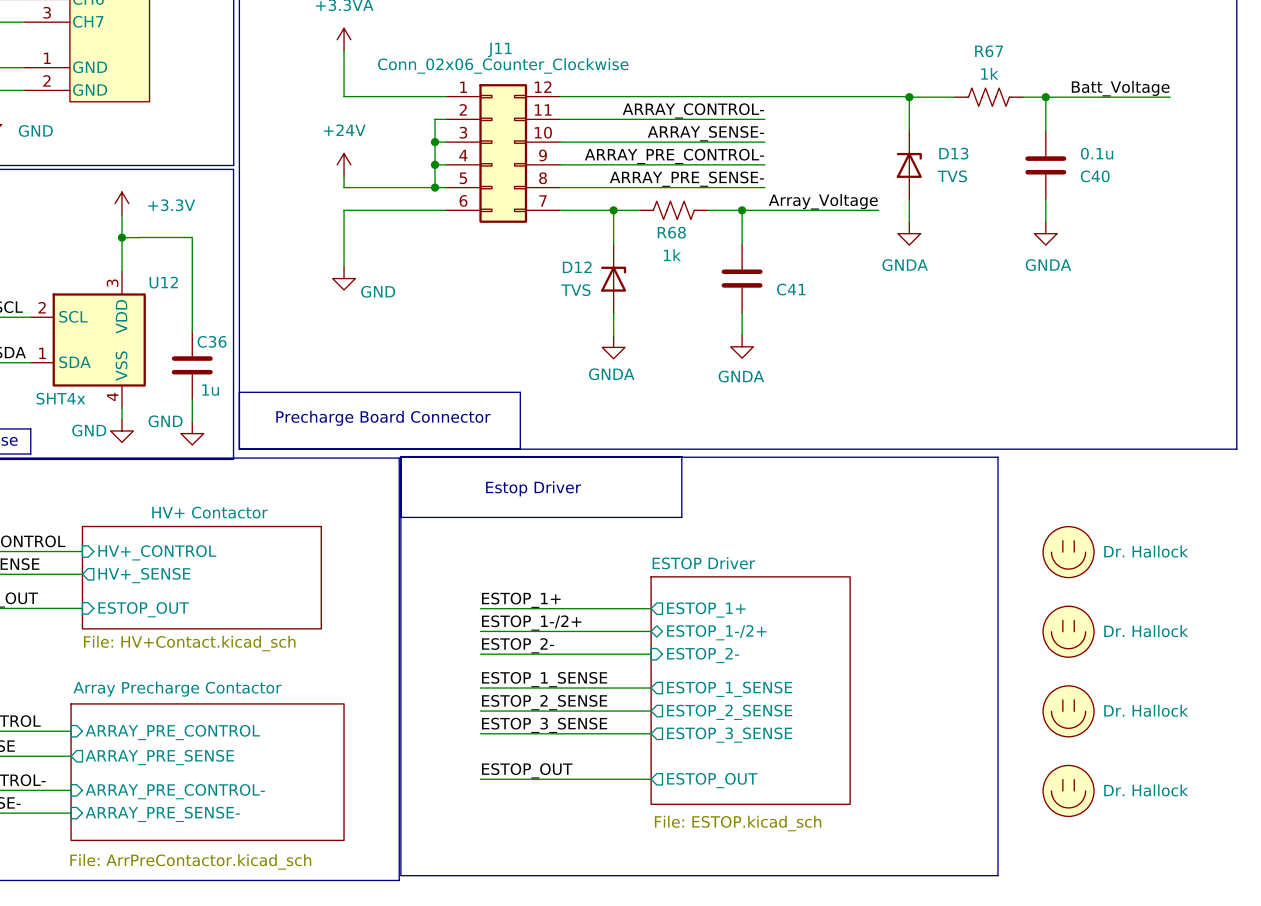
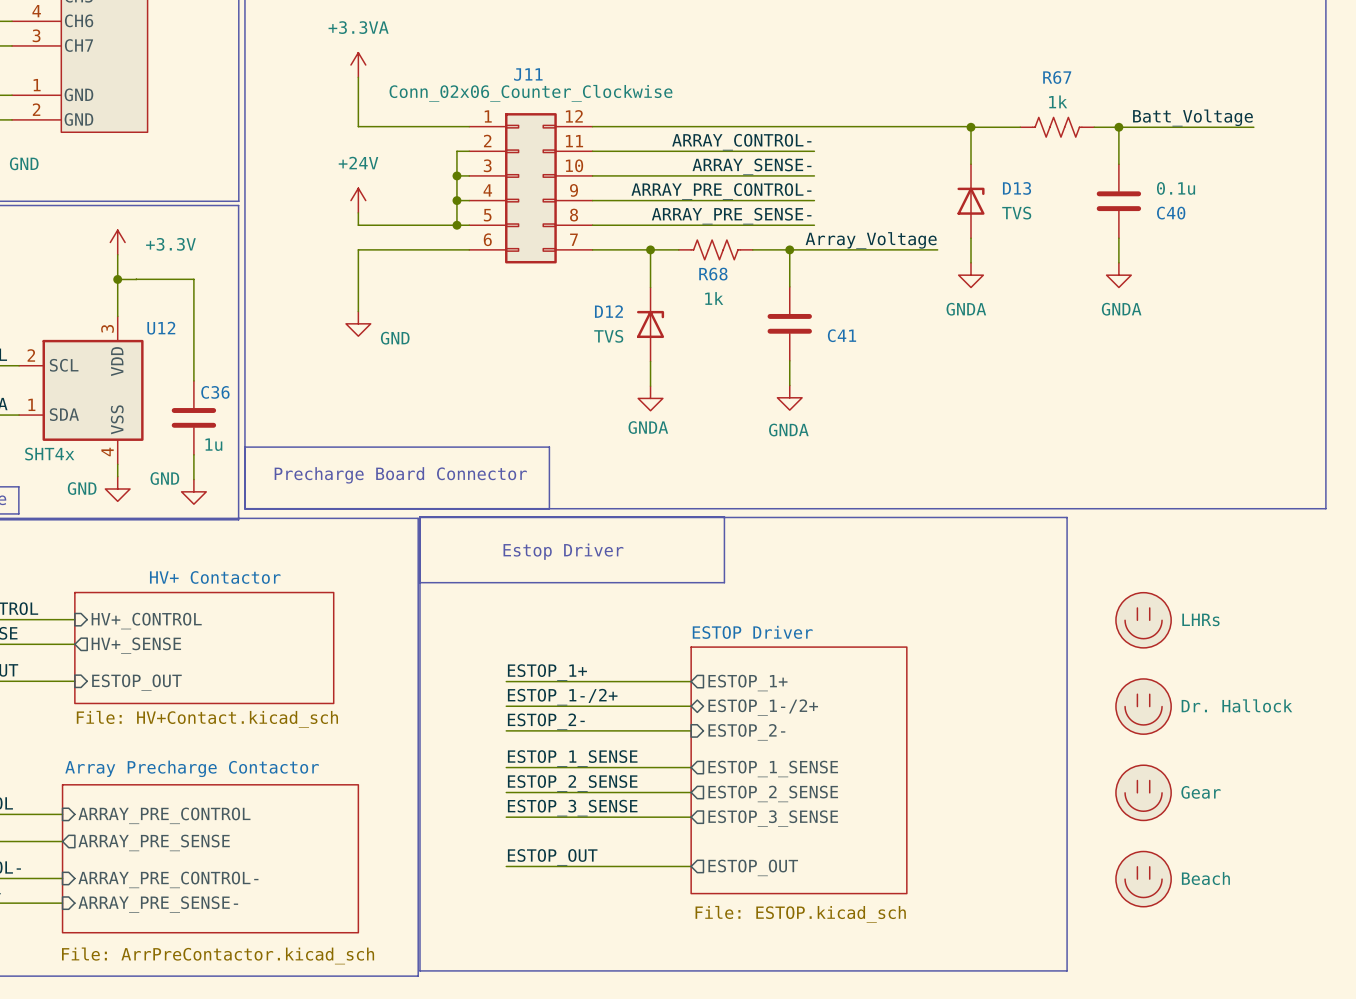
part value: Dr. Hallock (1146, 551) -> LHRs (1200, 619)
part value: Dr. Hallock (1146, 710) -> Gear (1200, 792)
part value: Dr. Hallock (1146, 790) -> Beach (1205, 878)

